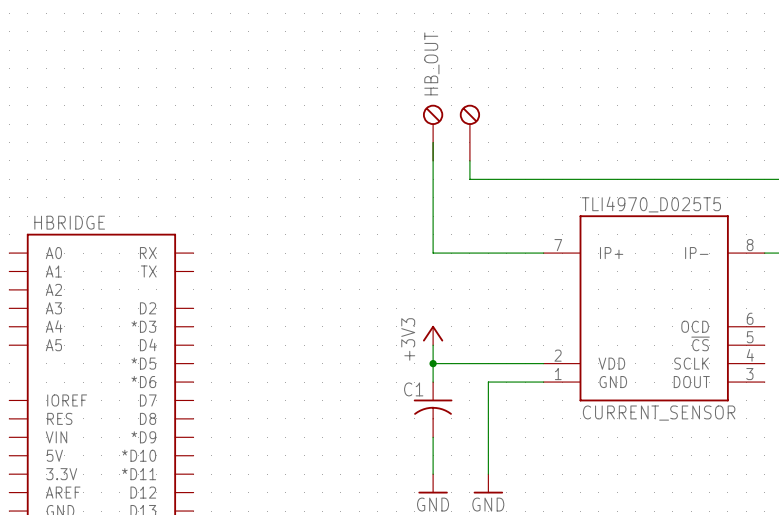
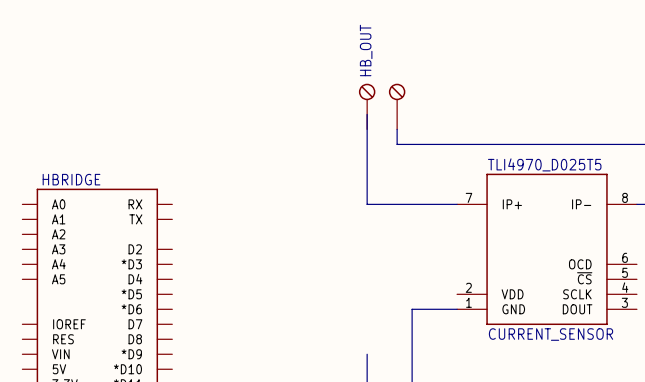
power symbol: +3V3 (433, 335) -> none
wire: (433, 345) (433, 382) -> none
wire: (433, 363) (543, 363) -> none
junction: (433, 363) -> none
C1: (433, 409) -> none

